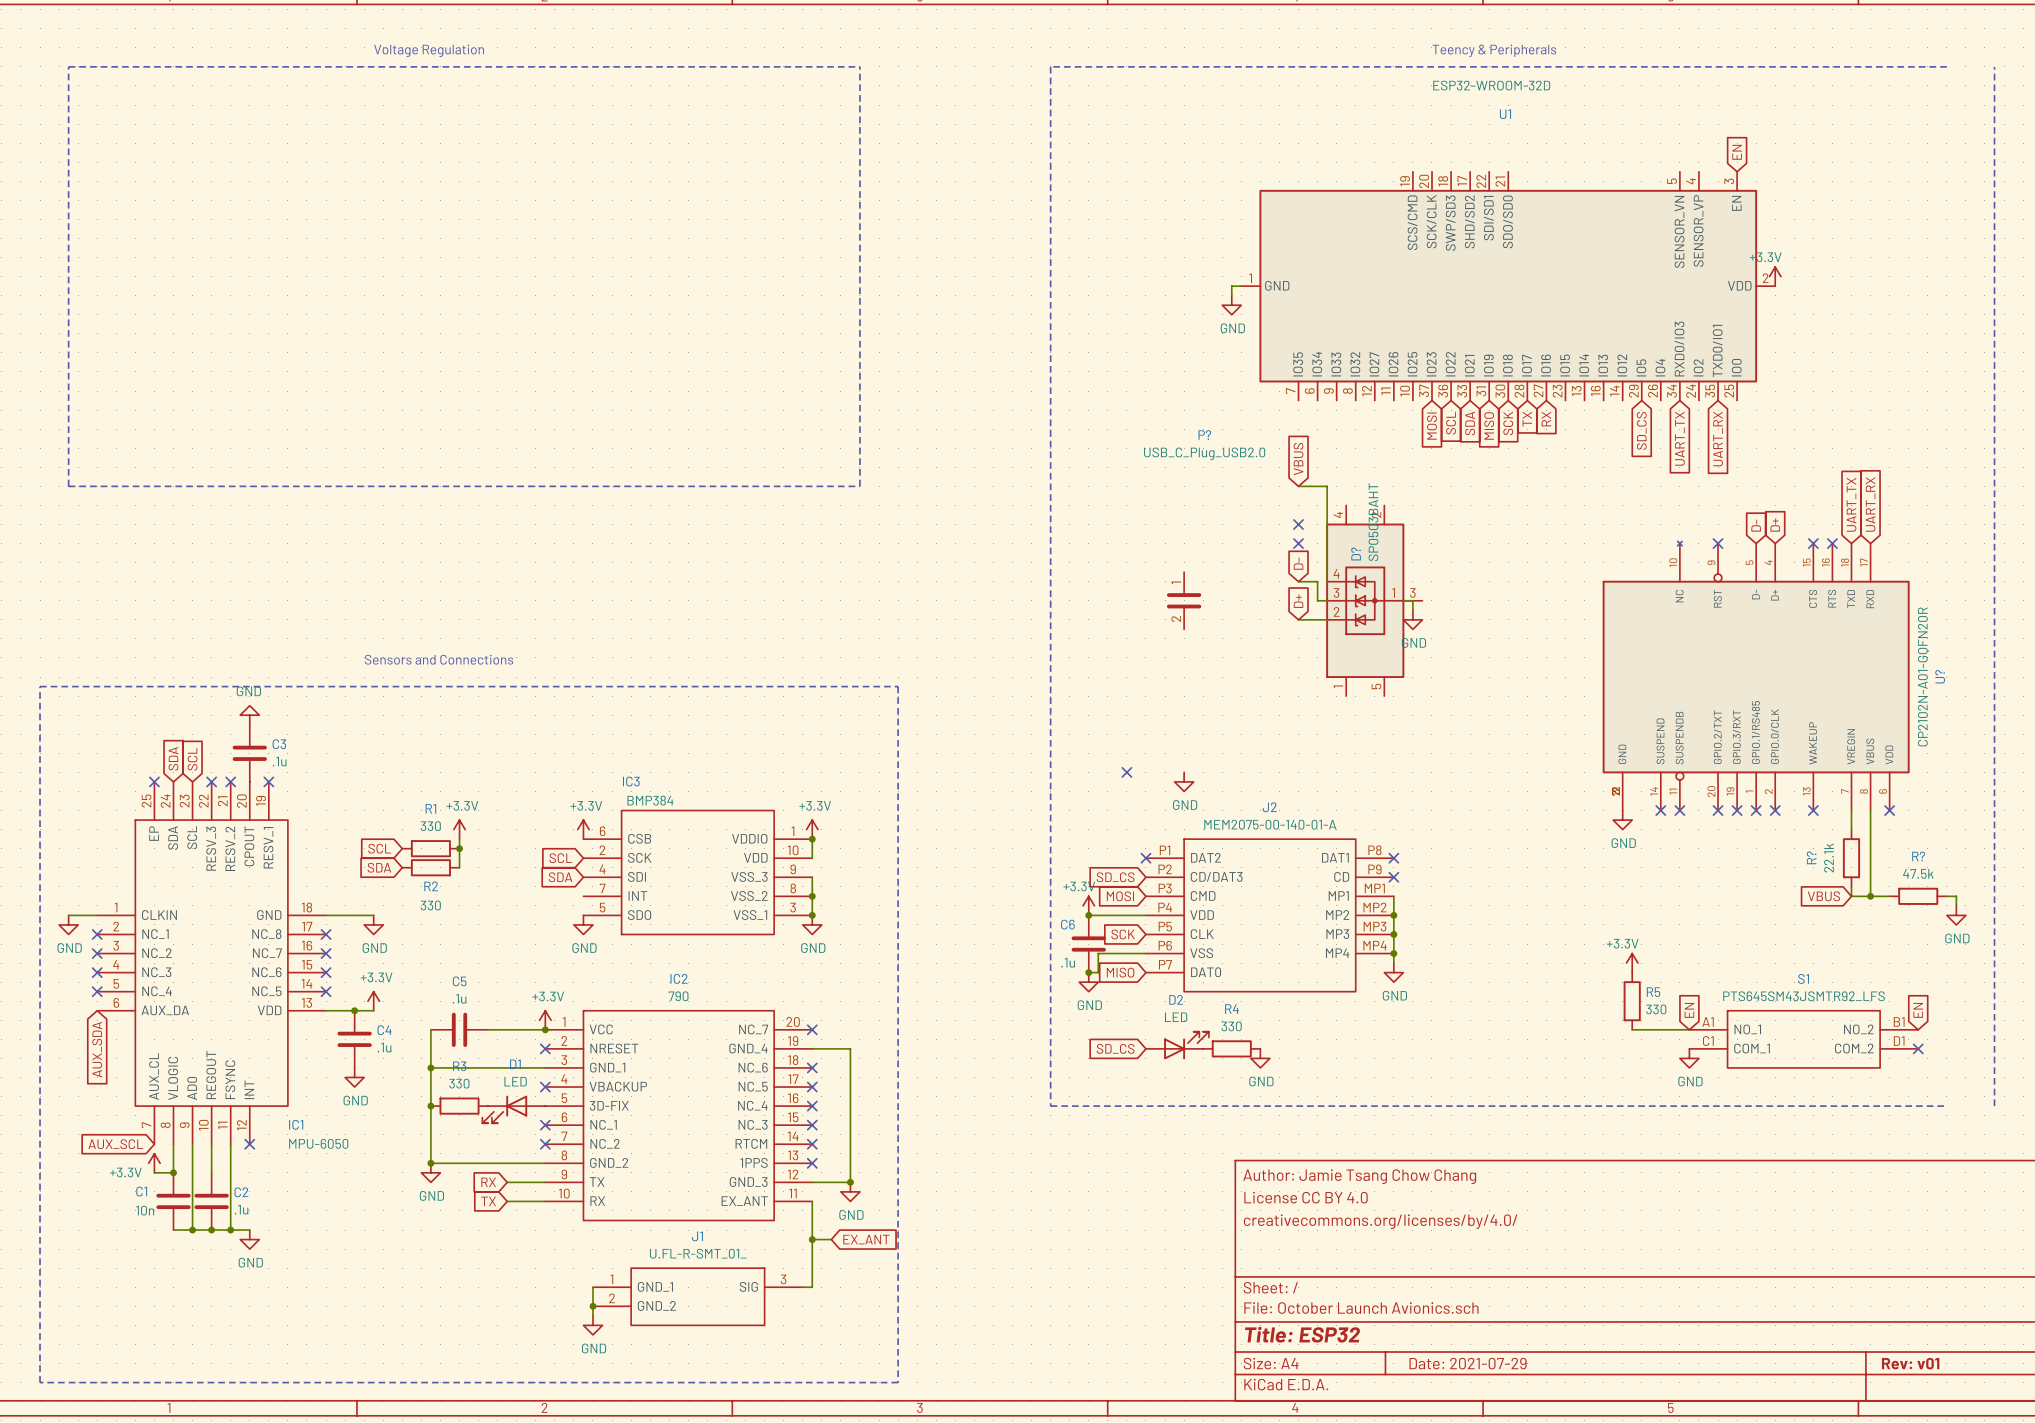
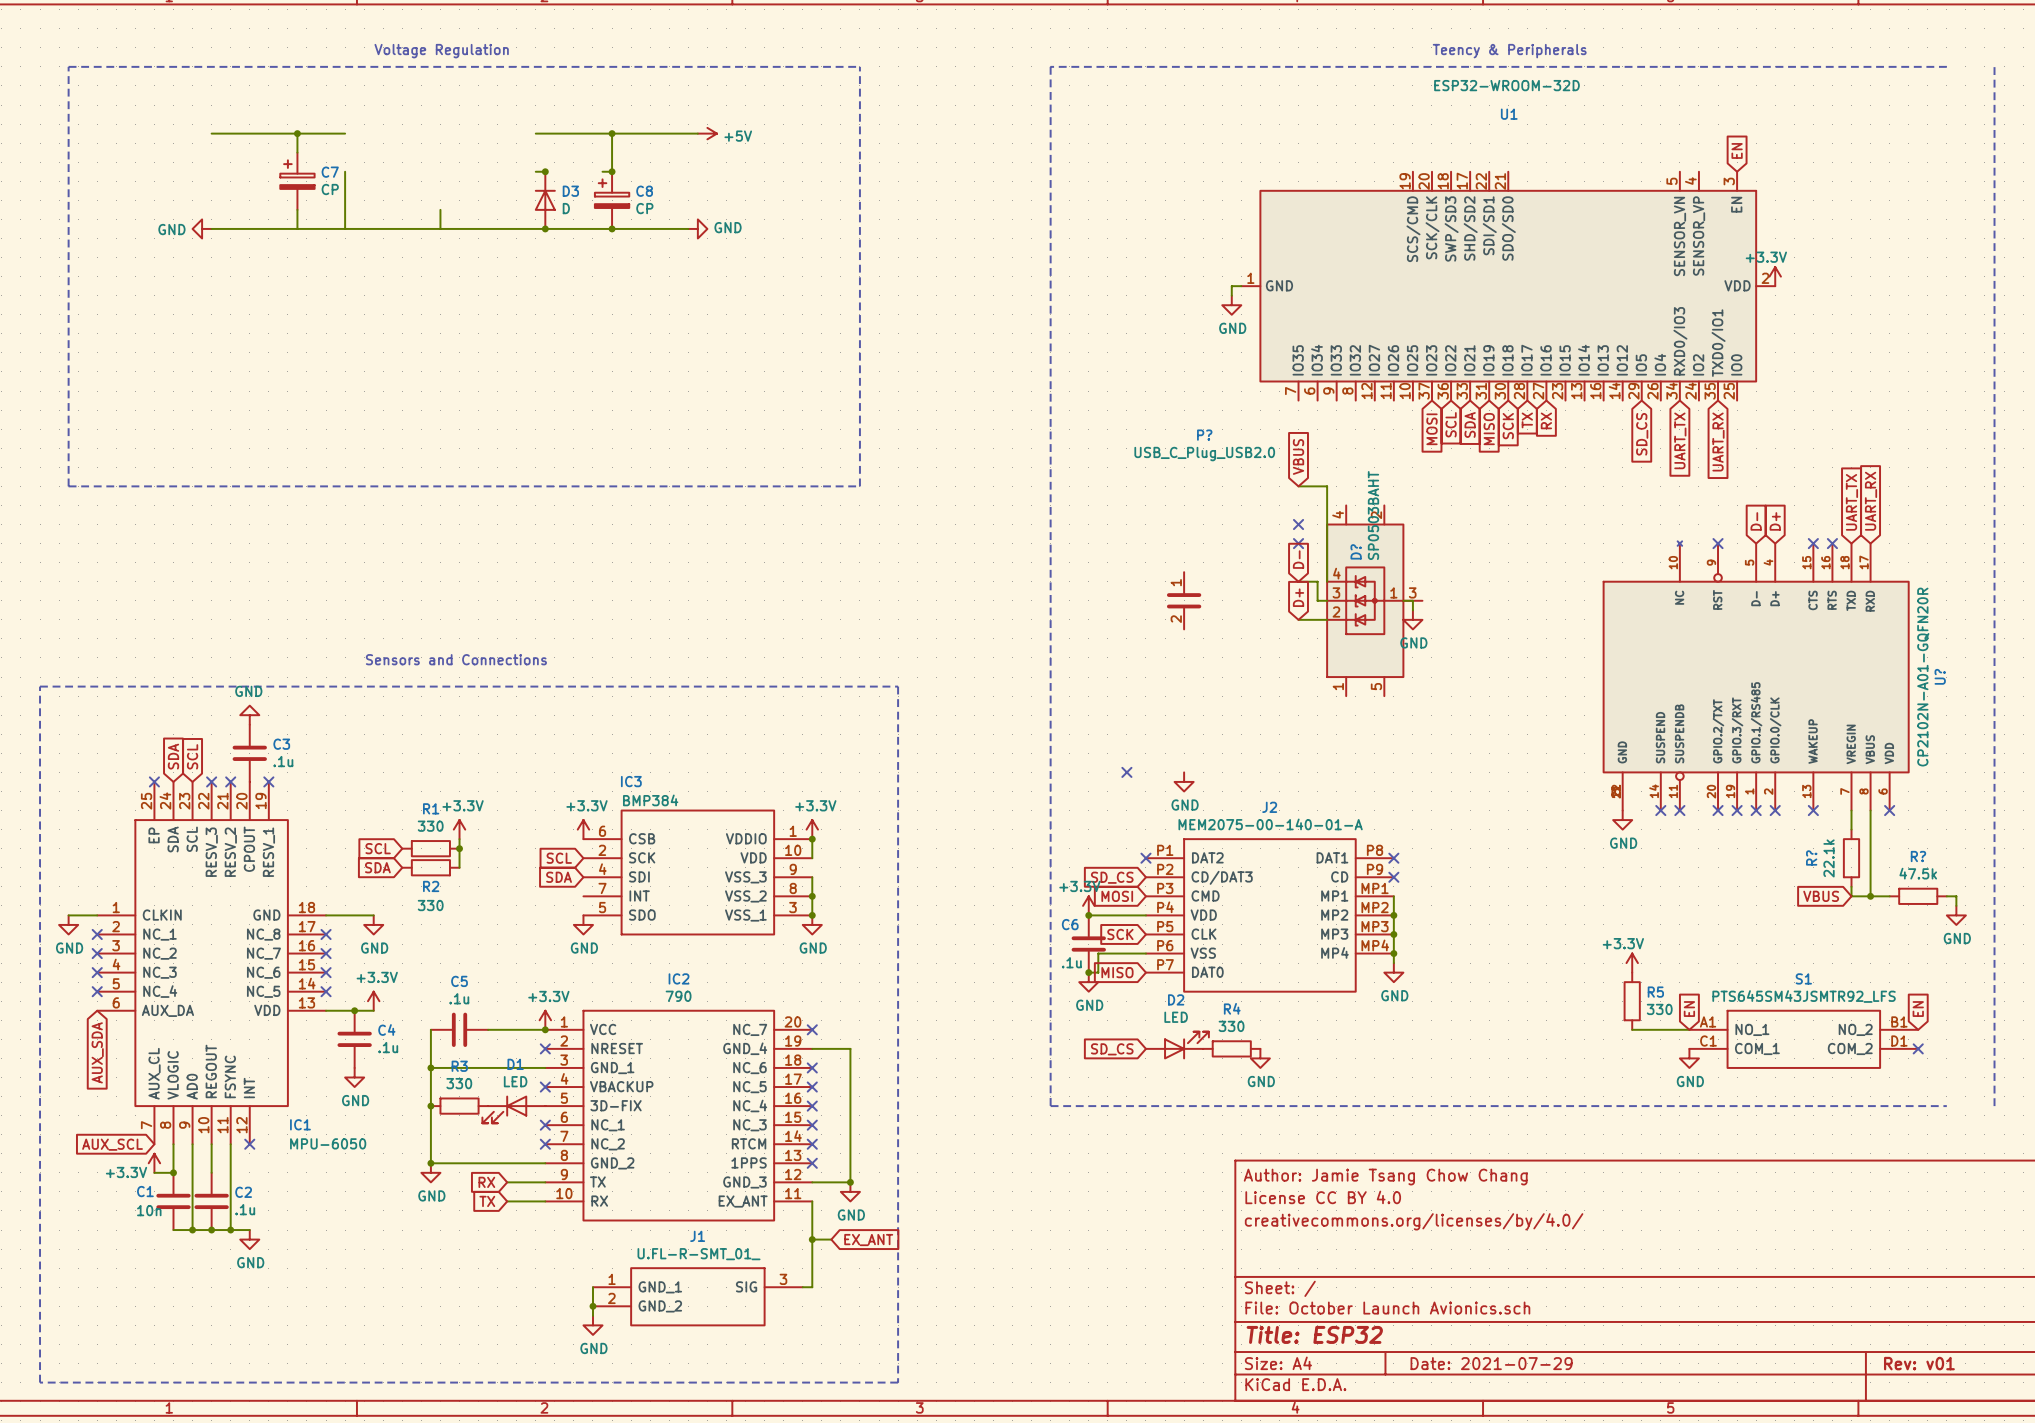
wire: none -> (211, 133) (345, 133)
wire: none -> (297, 133) (297, 152)
junction: none -> (297, 133)
wire: none -> (535, 133) (697, 133)
wire: none -> (612, 133) (612, 171) (602, 171)
junction: none -> (612, 133)
power symbol: none -> +5V (707, 133)
wire: none -> (345, 171) (345, 228)
wire: none -> (535, 171) (545, 171)
junction: none -> (545, 171)
junction: none -> (612, 171)
C7: none -> CP (297, 181)
D3: none -> D (545, 200)
C8: none -> CP (612, 200)
wire: none -> (297, 209) (297, 228)
wire: none -> (440, 209) (440, 228)
power symbol: none -> GND (202, 228)
wire: none -> (211, 228) (688, 228)
junction: none -> (545, 228)
junction: none -> (612, 228)
power symbol: none -> GND (697, 228)

